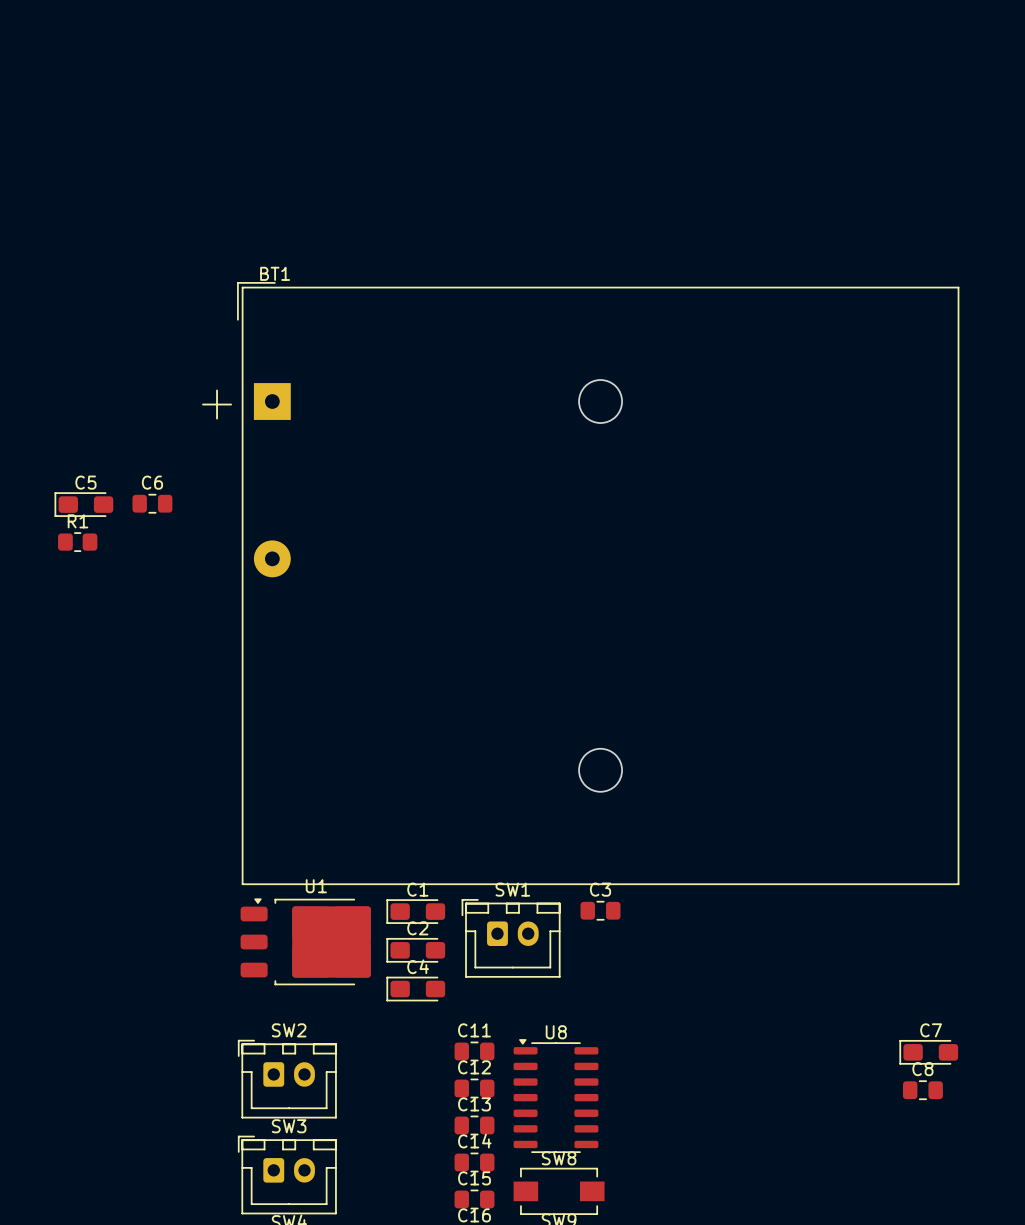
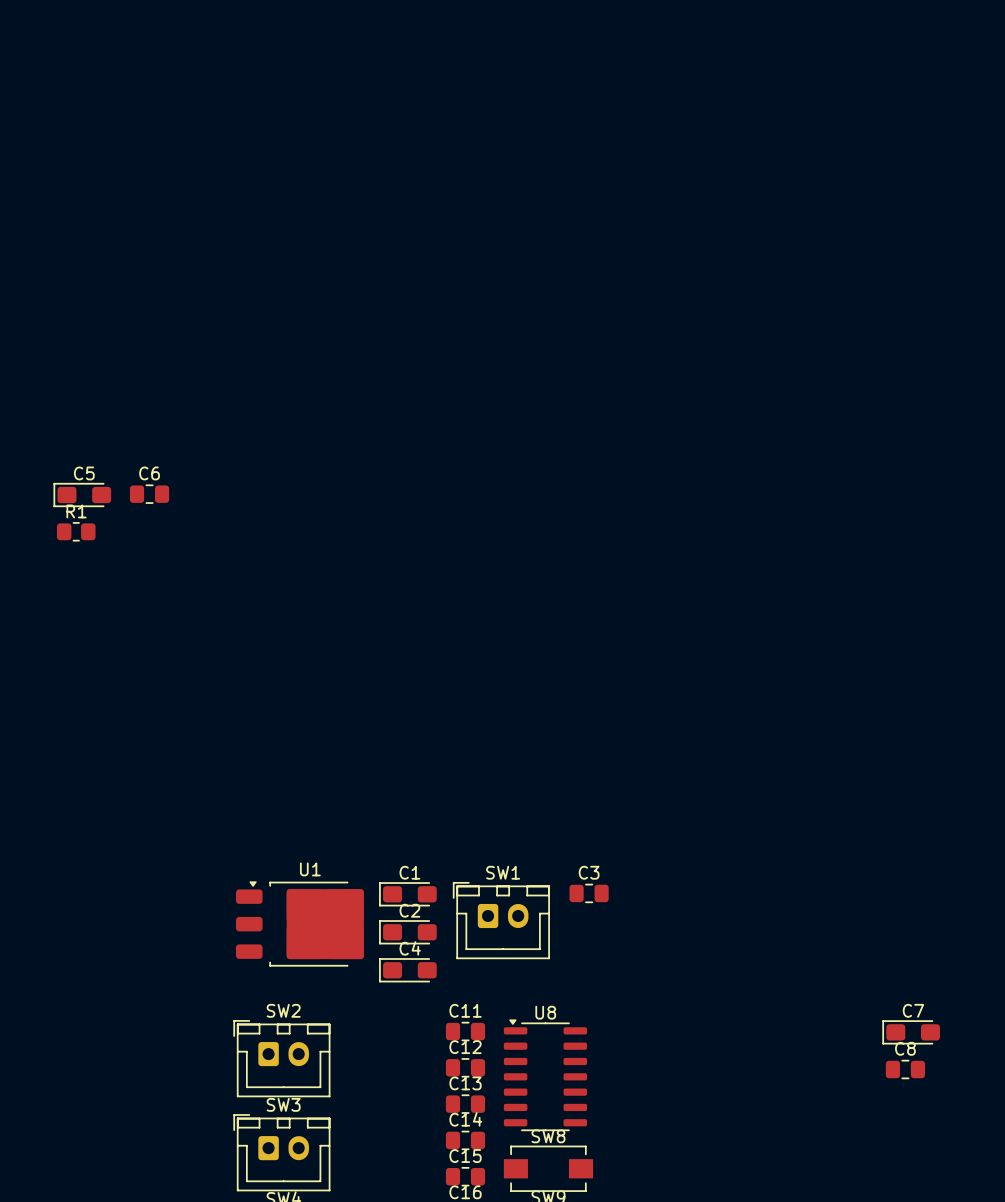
BT1: (598, 583) -> none

